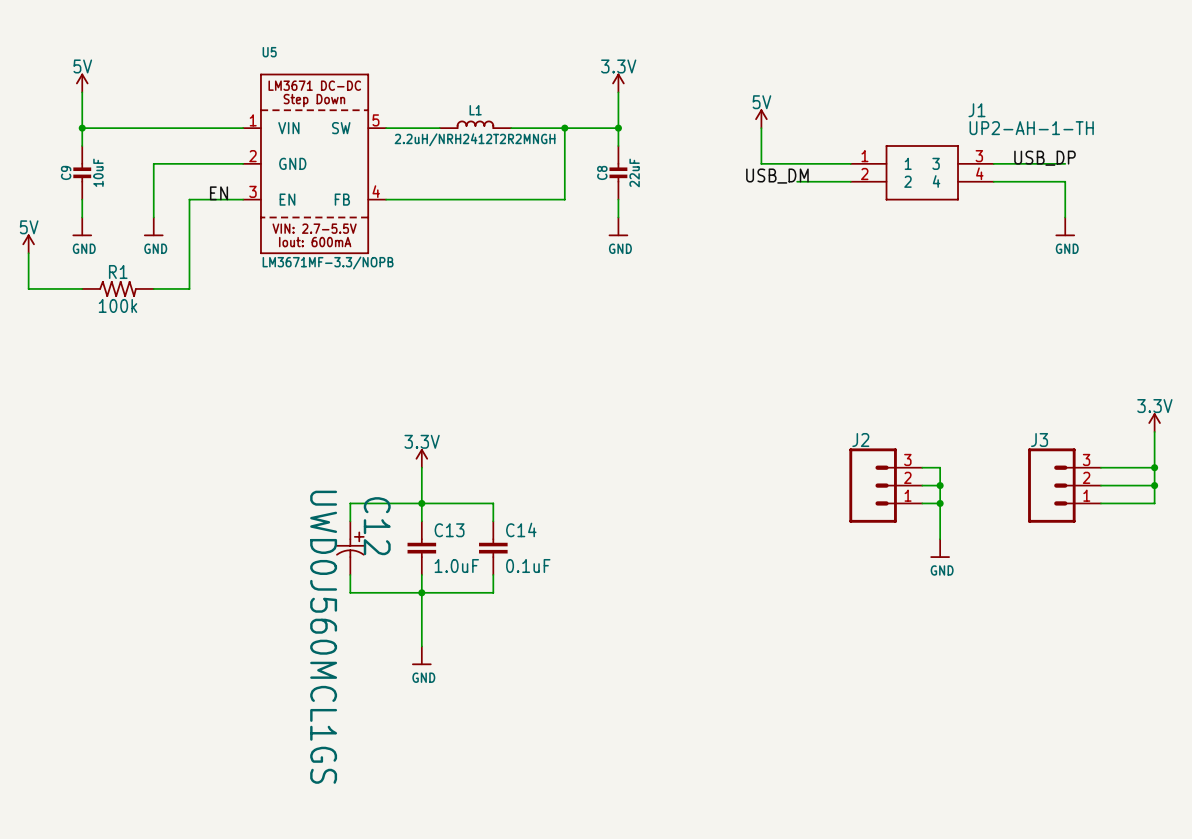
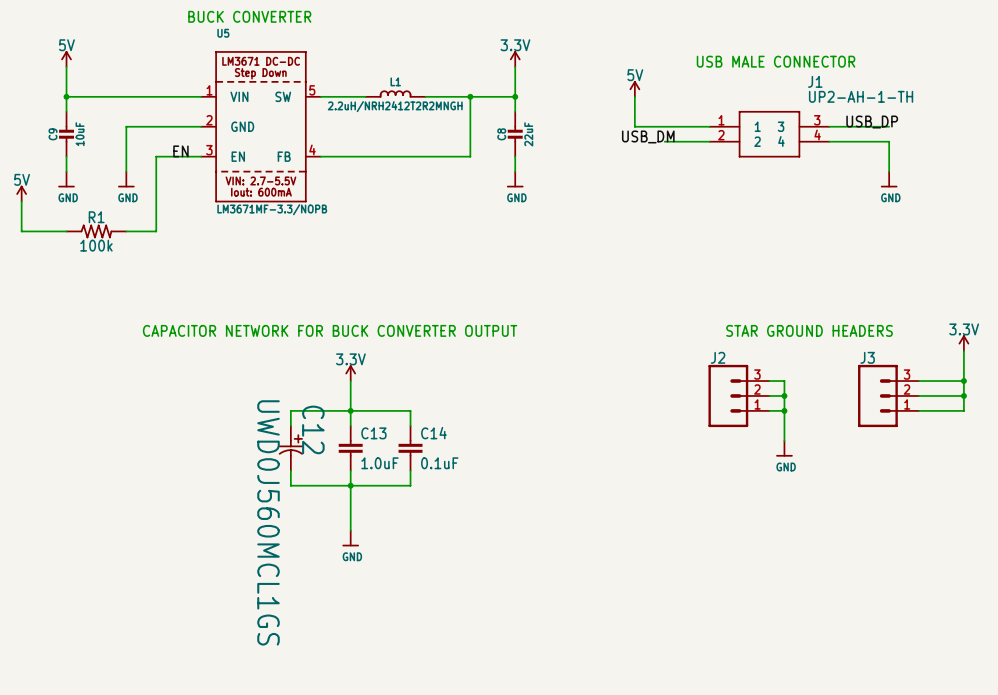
text: none -> BUCK CONVERTER (249, 16)
text: none -> USB MALE CONNECTOR (776, 61)
text: none -> CAPACITOR NETWORK FOR BUCK CONVERTER OUTPUT (330, 330)
text: none -> STAR GROUND HEADERS (809, 330)

